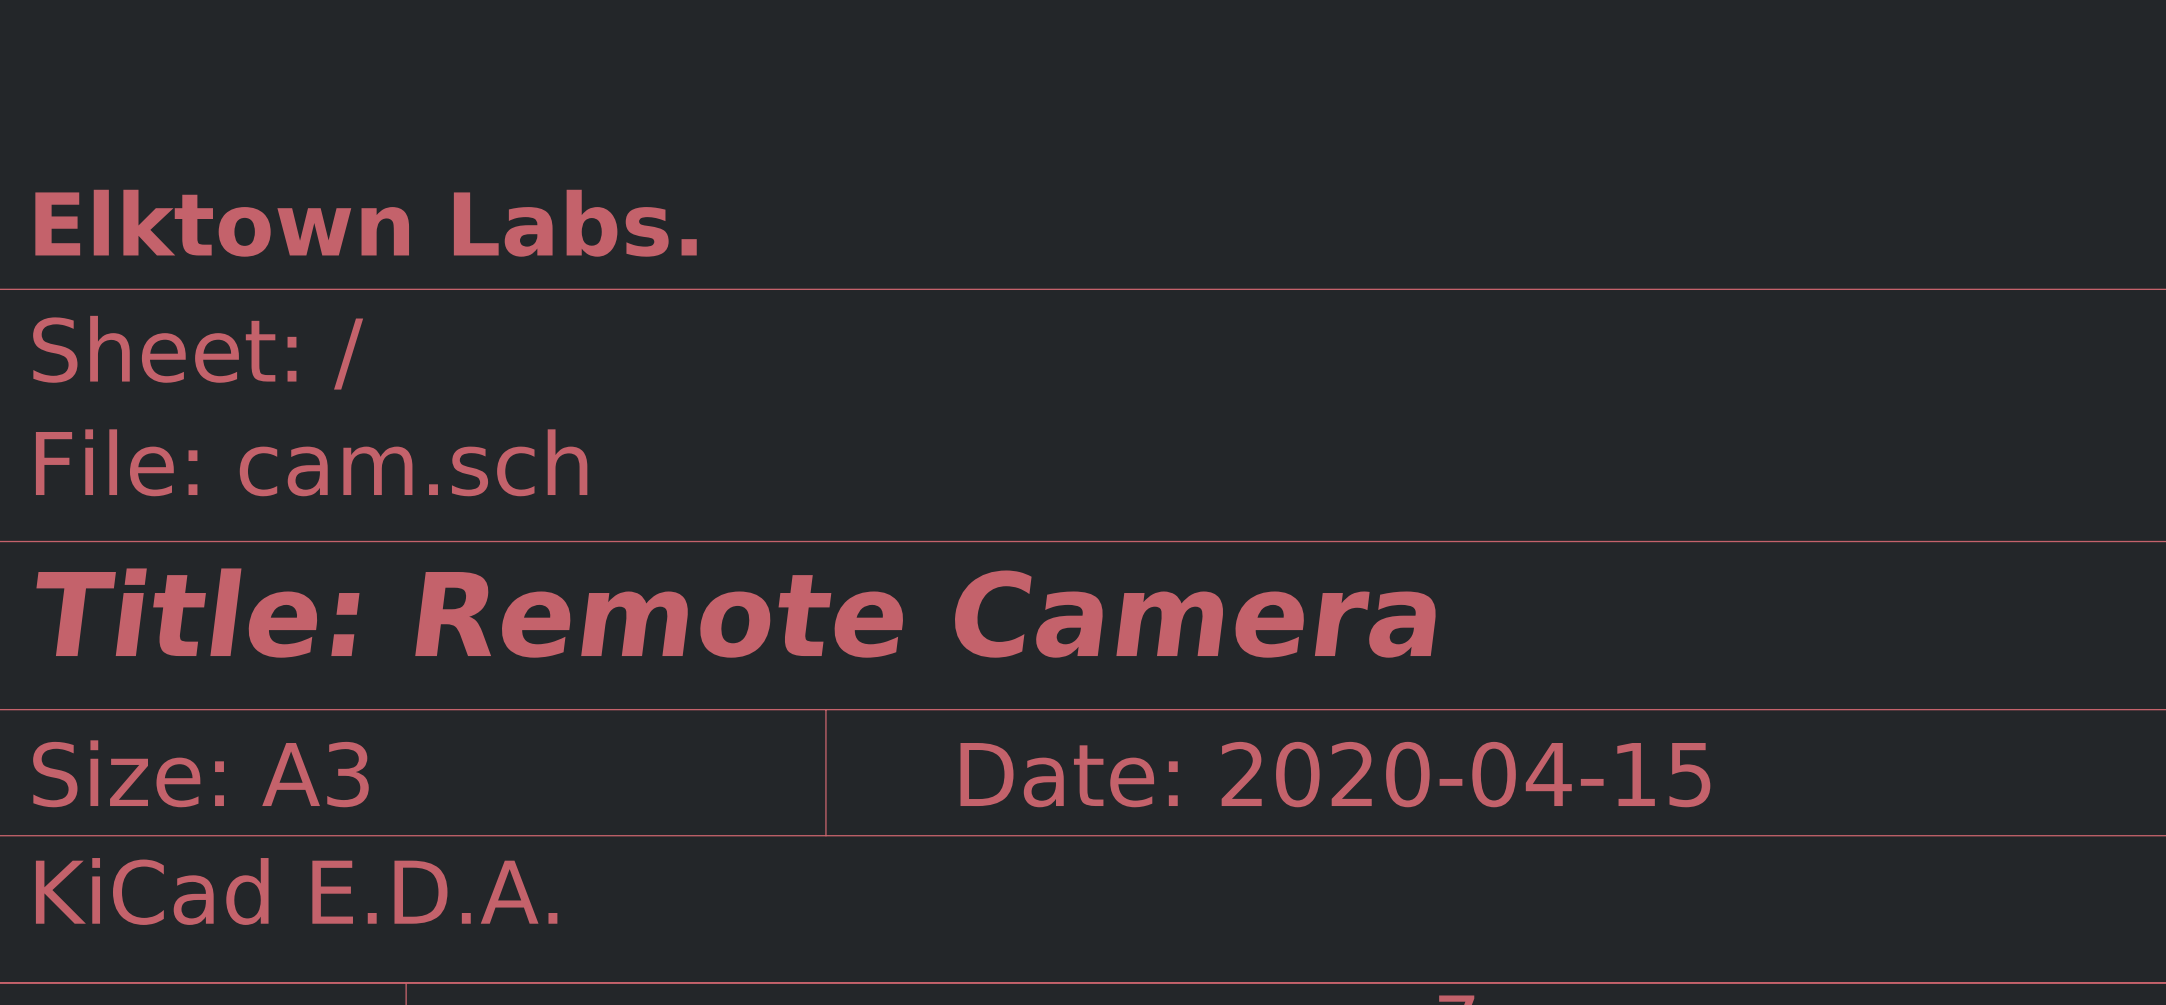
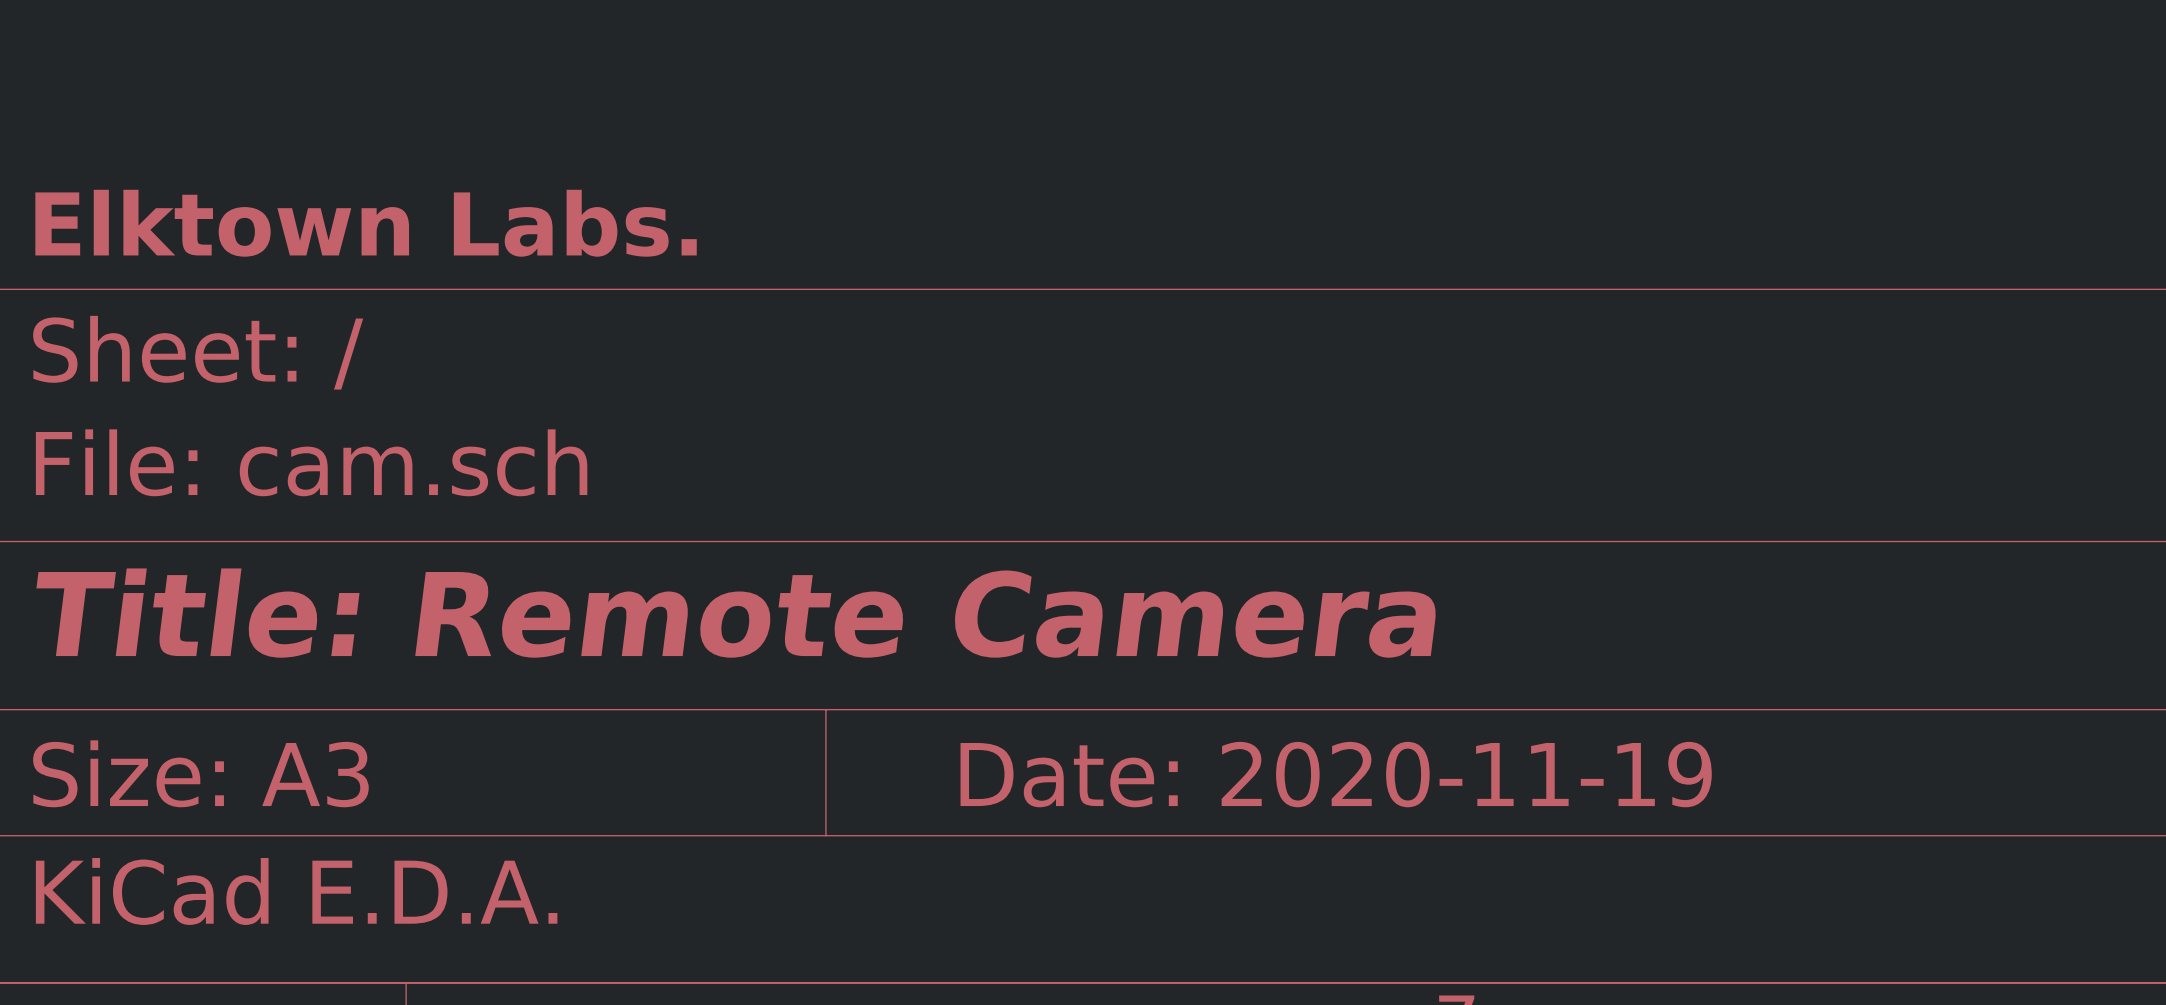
title block: Date: 2020-04-15 (1335, 774) -> Date: 2020-11-19 (1336, 774)

